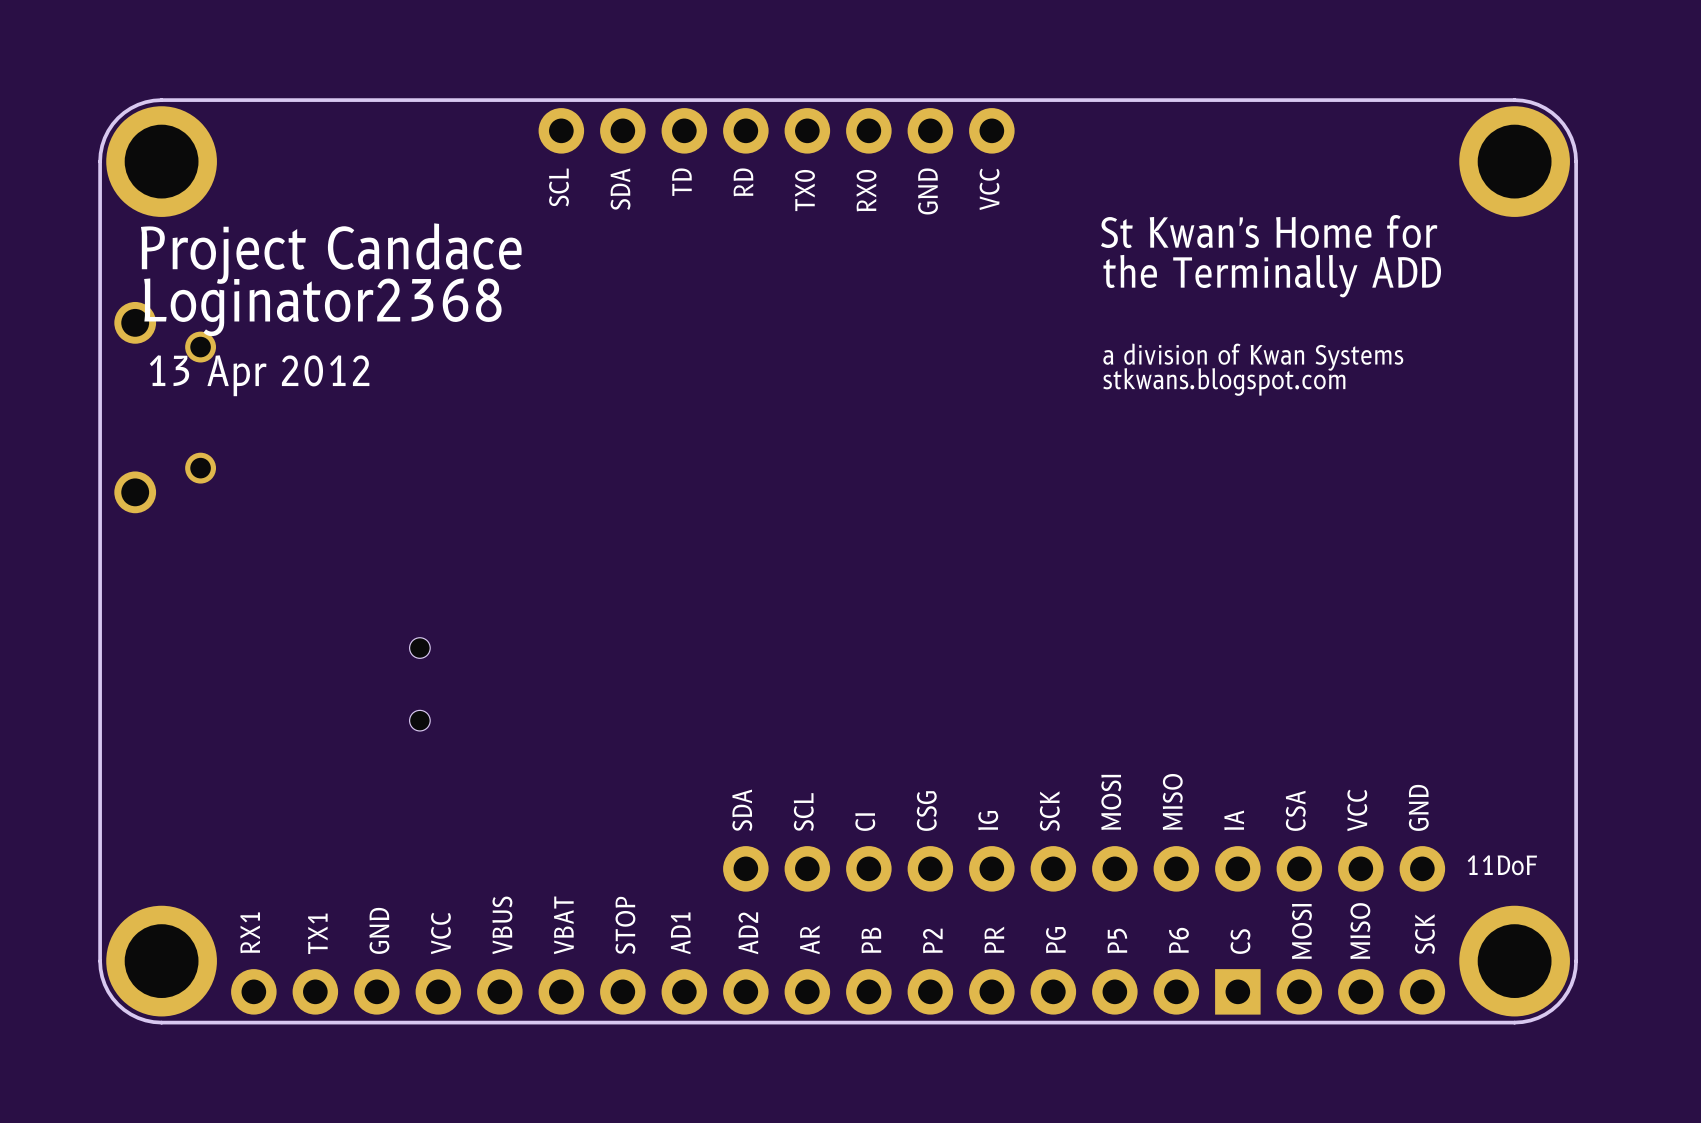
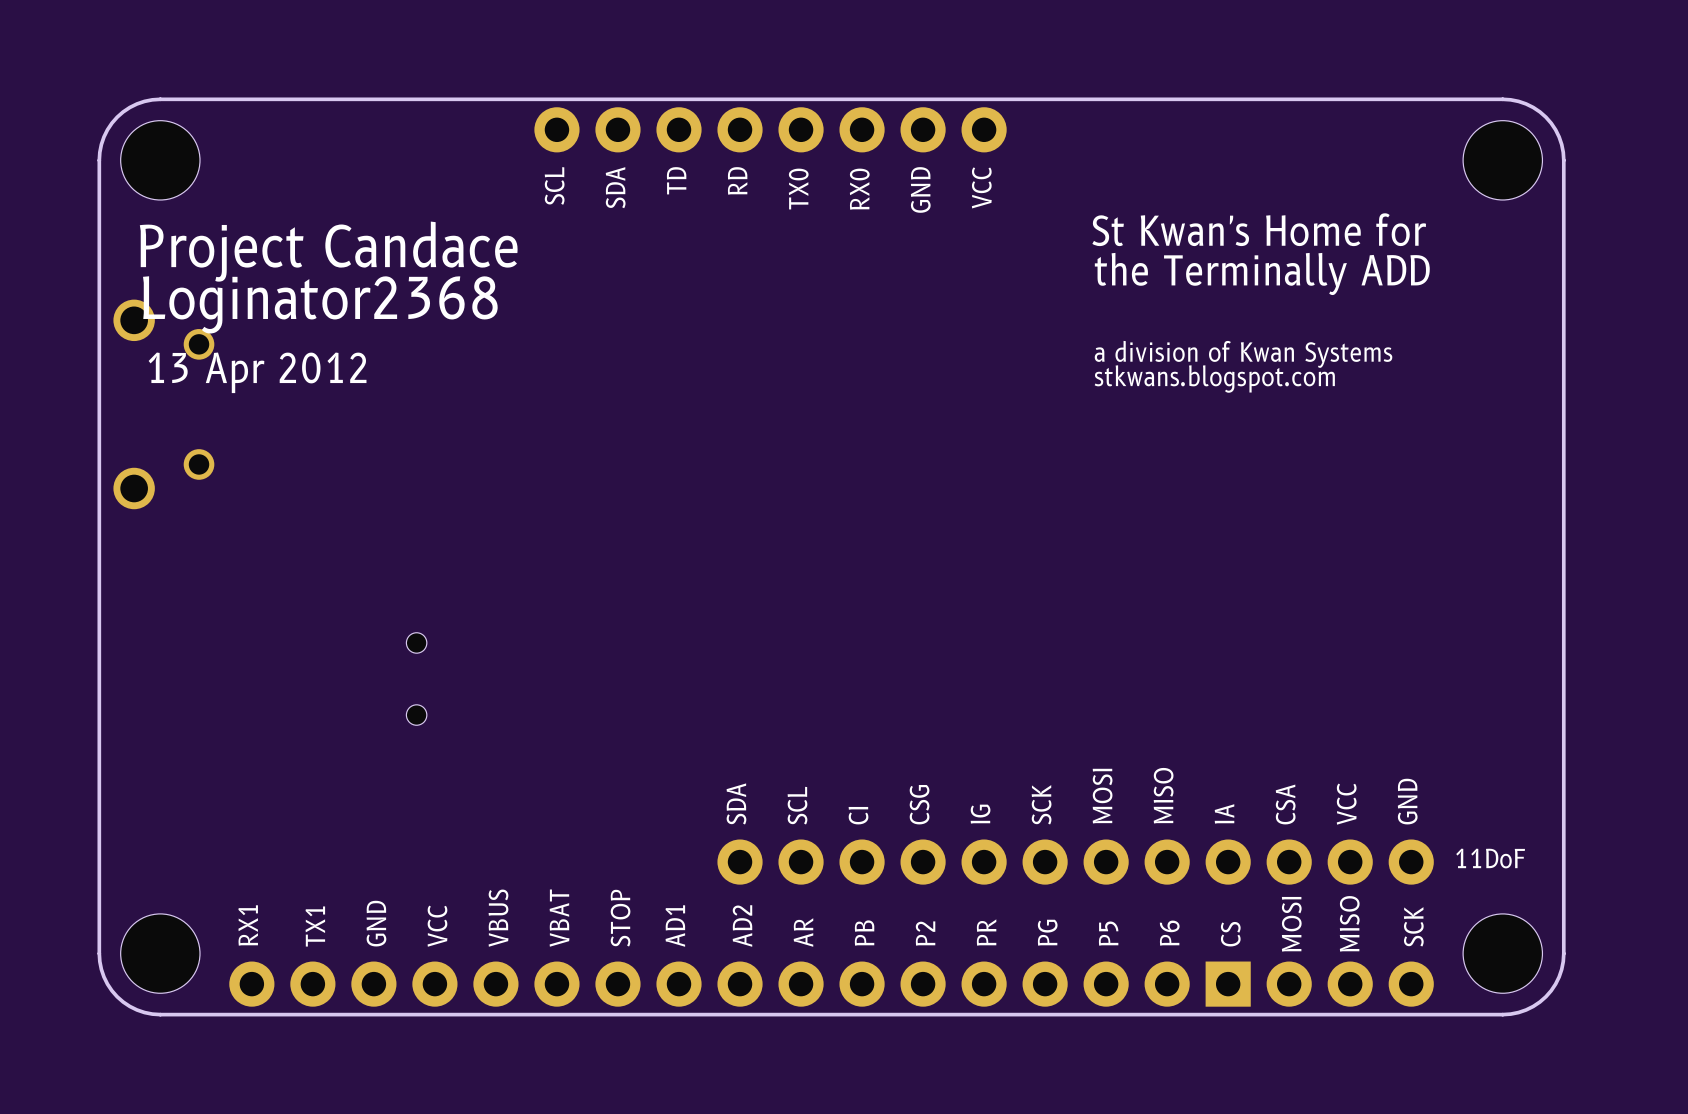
part footprint: [106, 106, 217, 217] -> [120, 120, 200, 200]
part footprint: [1459, 106, 1570, 217] -> [1463, 120, 1543, 200]
part footprint: [106, 905, 217, 1017] -> [120, 913, 200, 994]
part footprint: [1459, 905, 1570, 1017] -> [1463, 913, 1543, 994]

